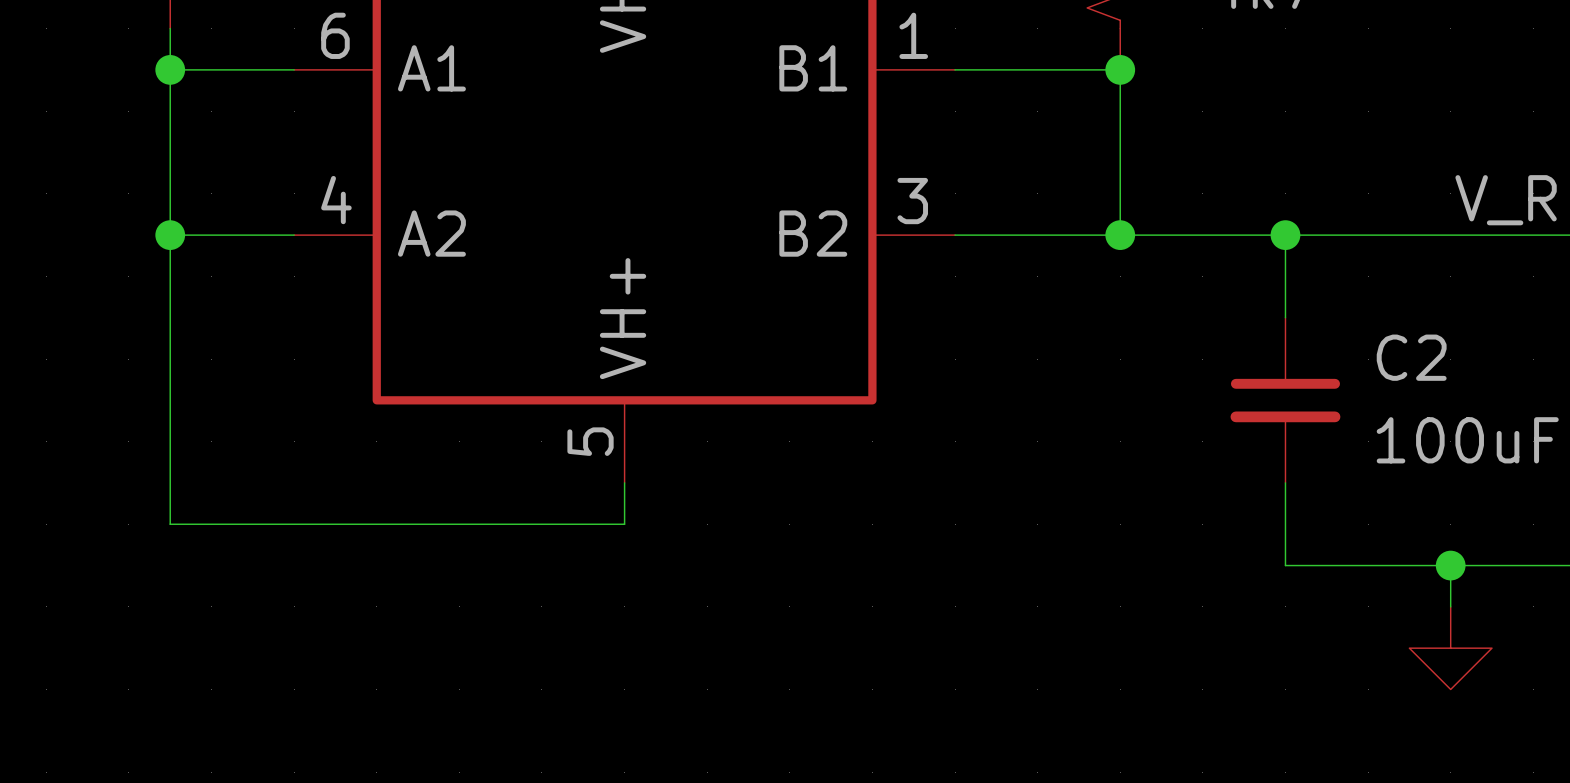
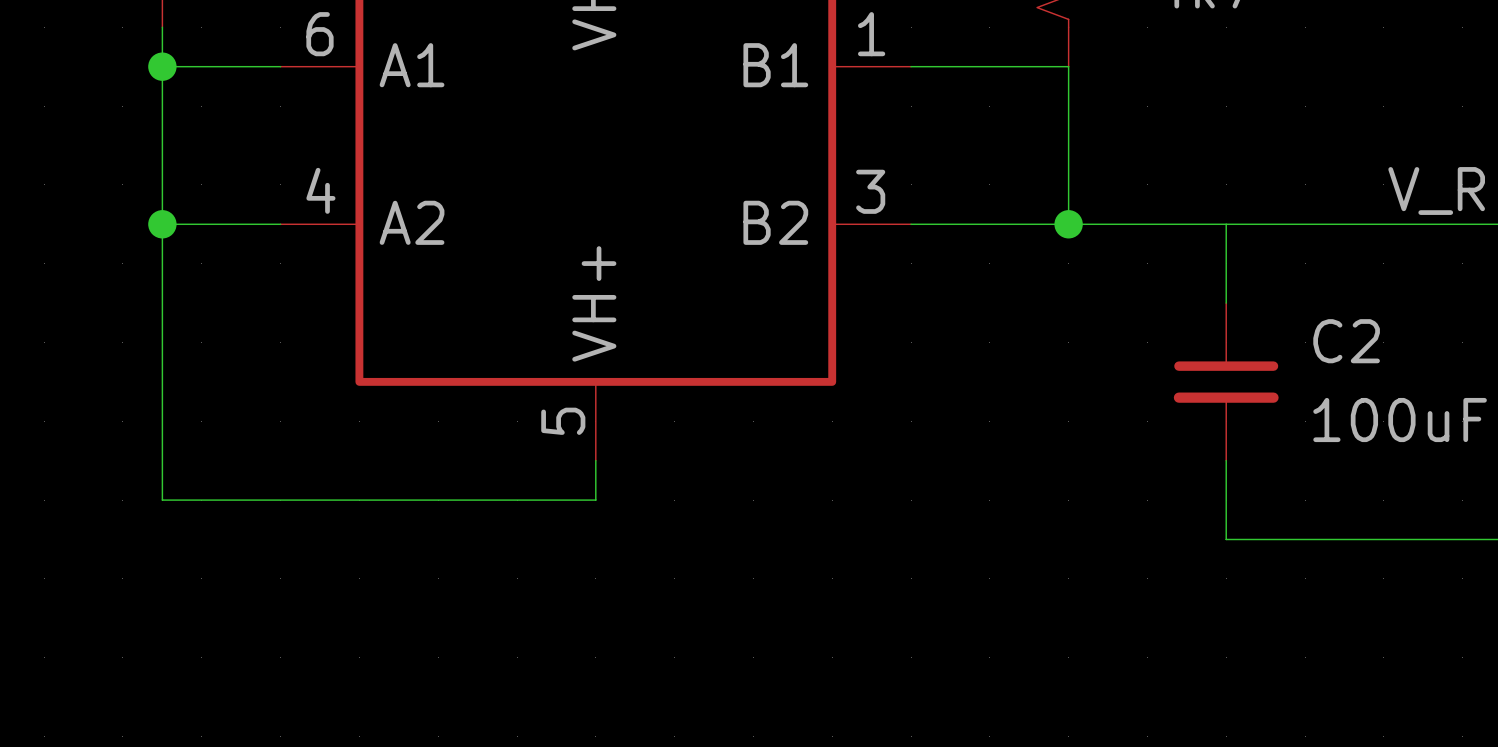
junction: (1120, 69) -> none
junction: (1285, 235) -> none
wire: (1450, 565) (1450, 606) -> none
junction: (1450, 565) -> none
power symbol: (1450, 648) -> none

